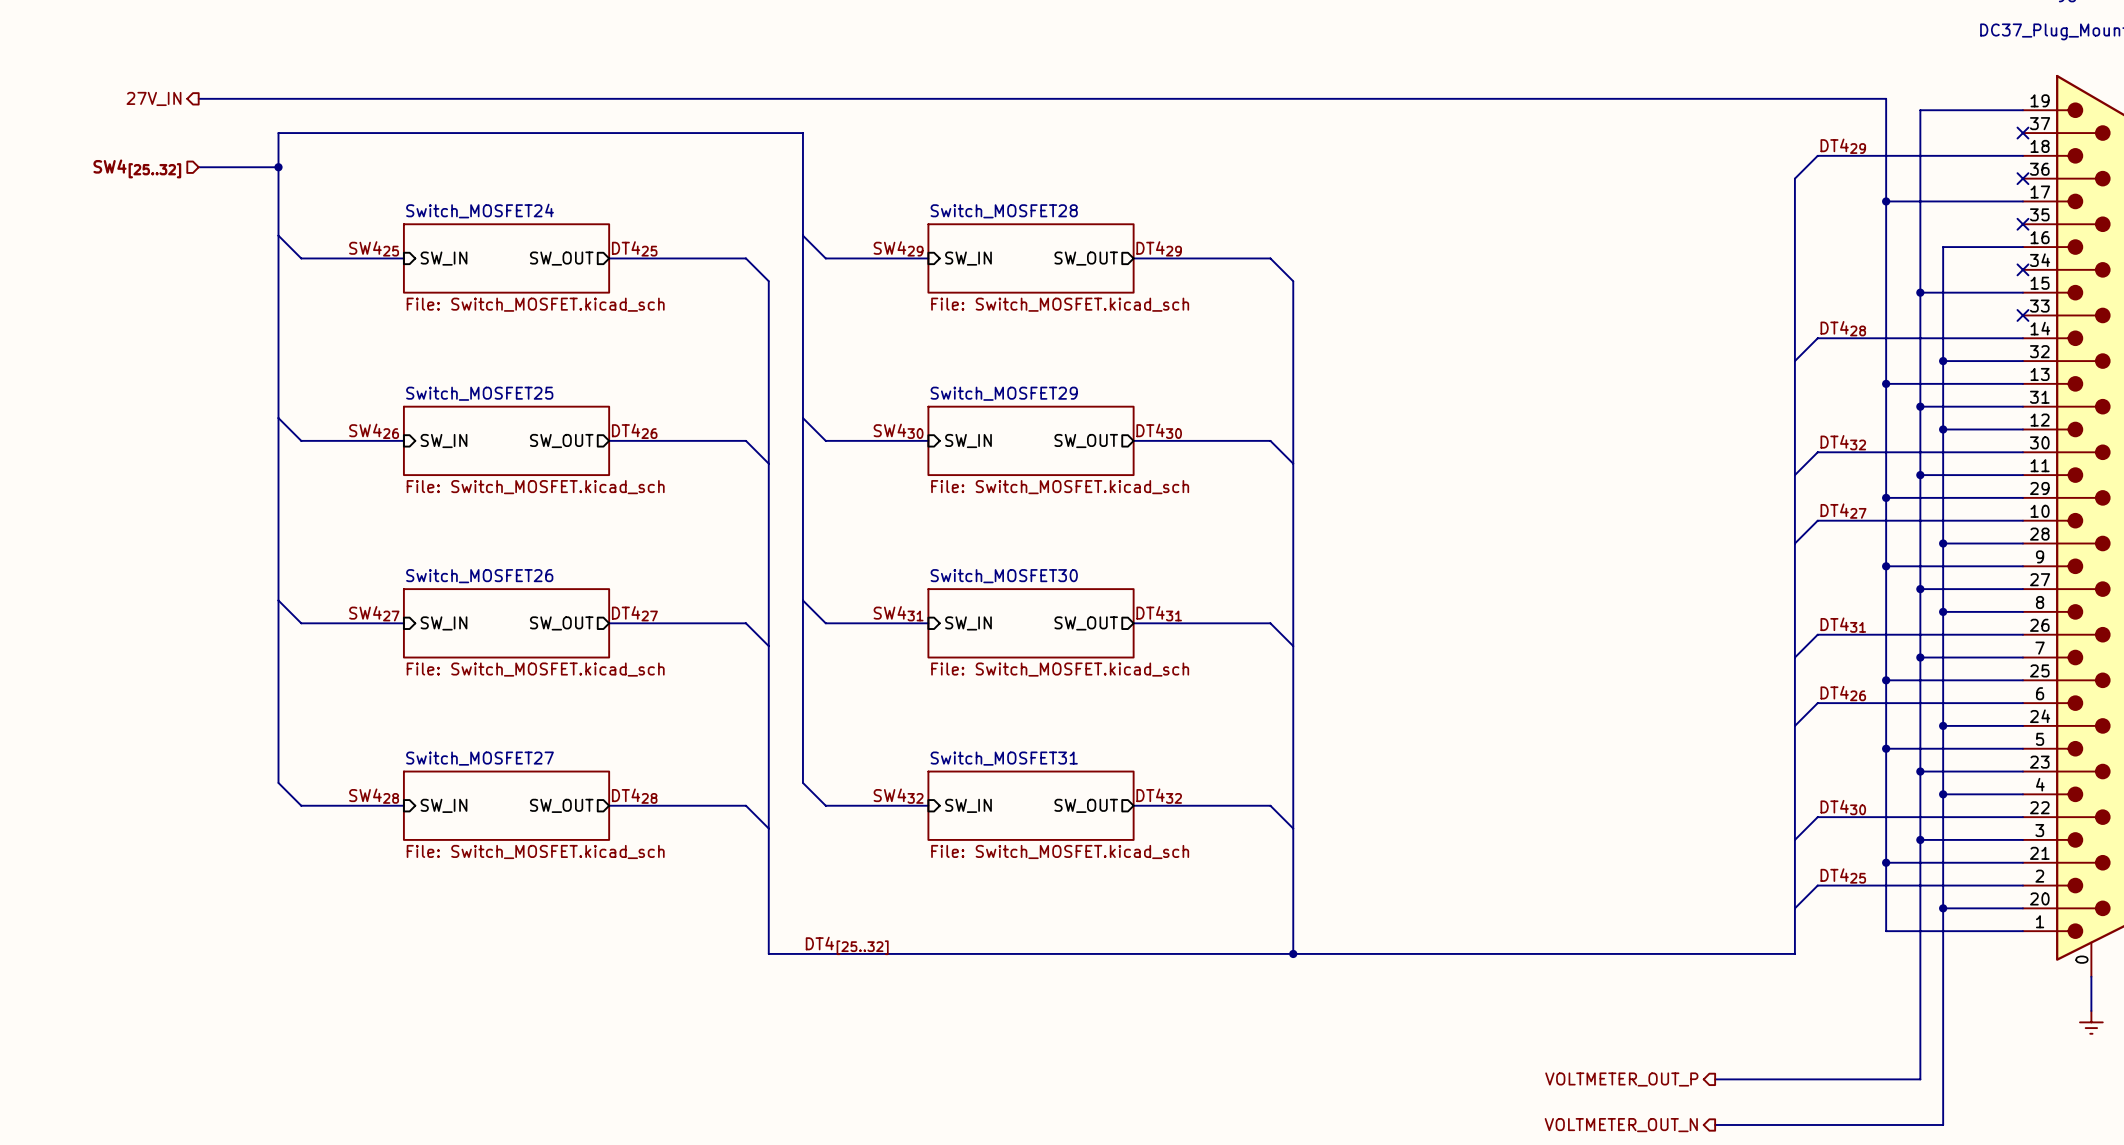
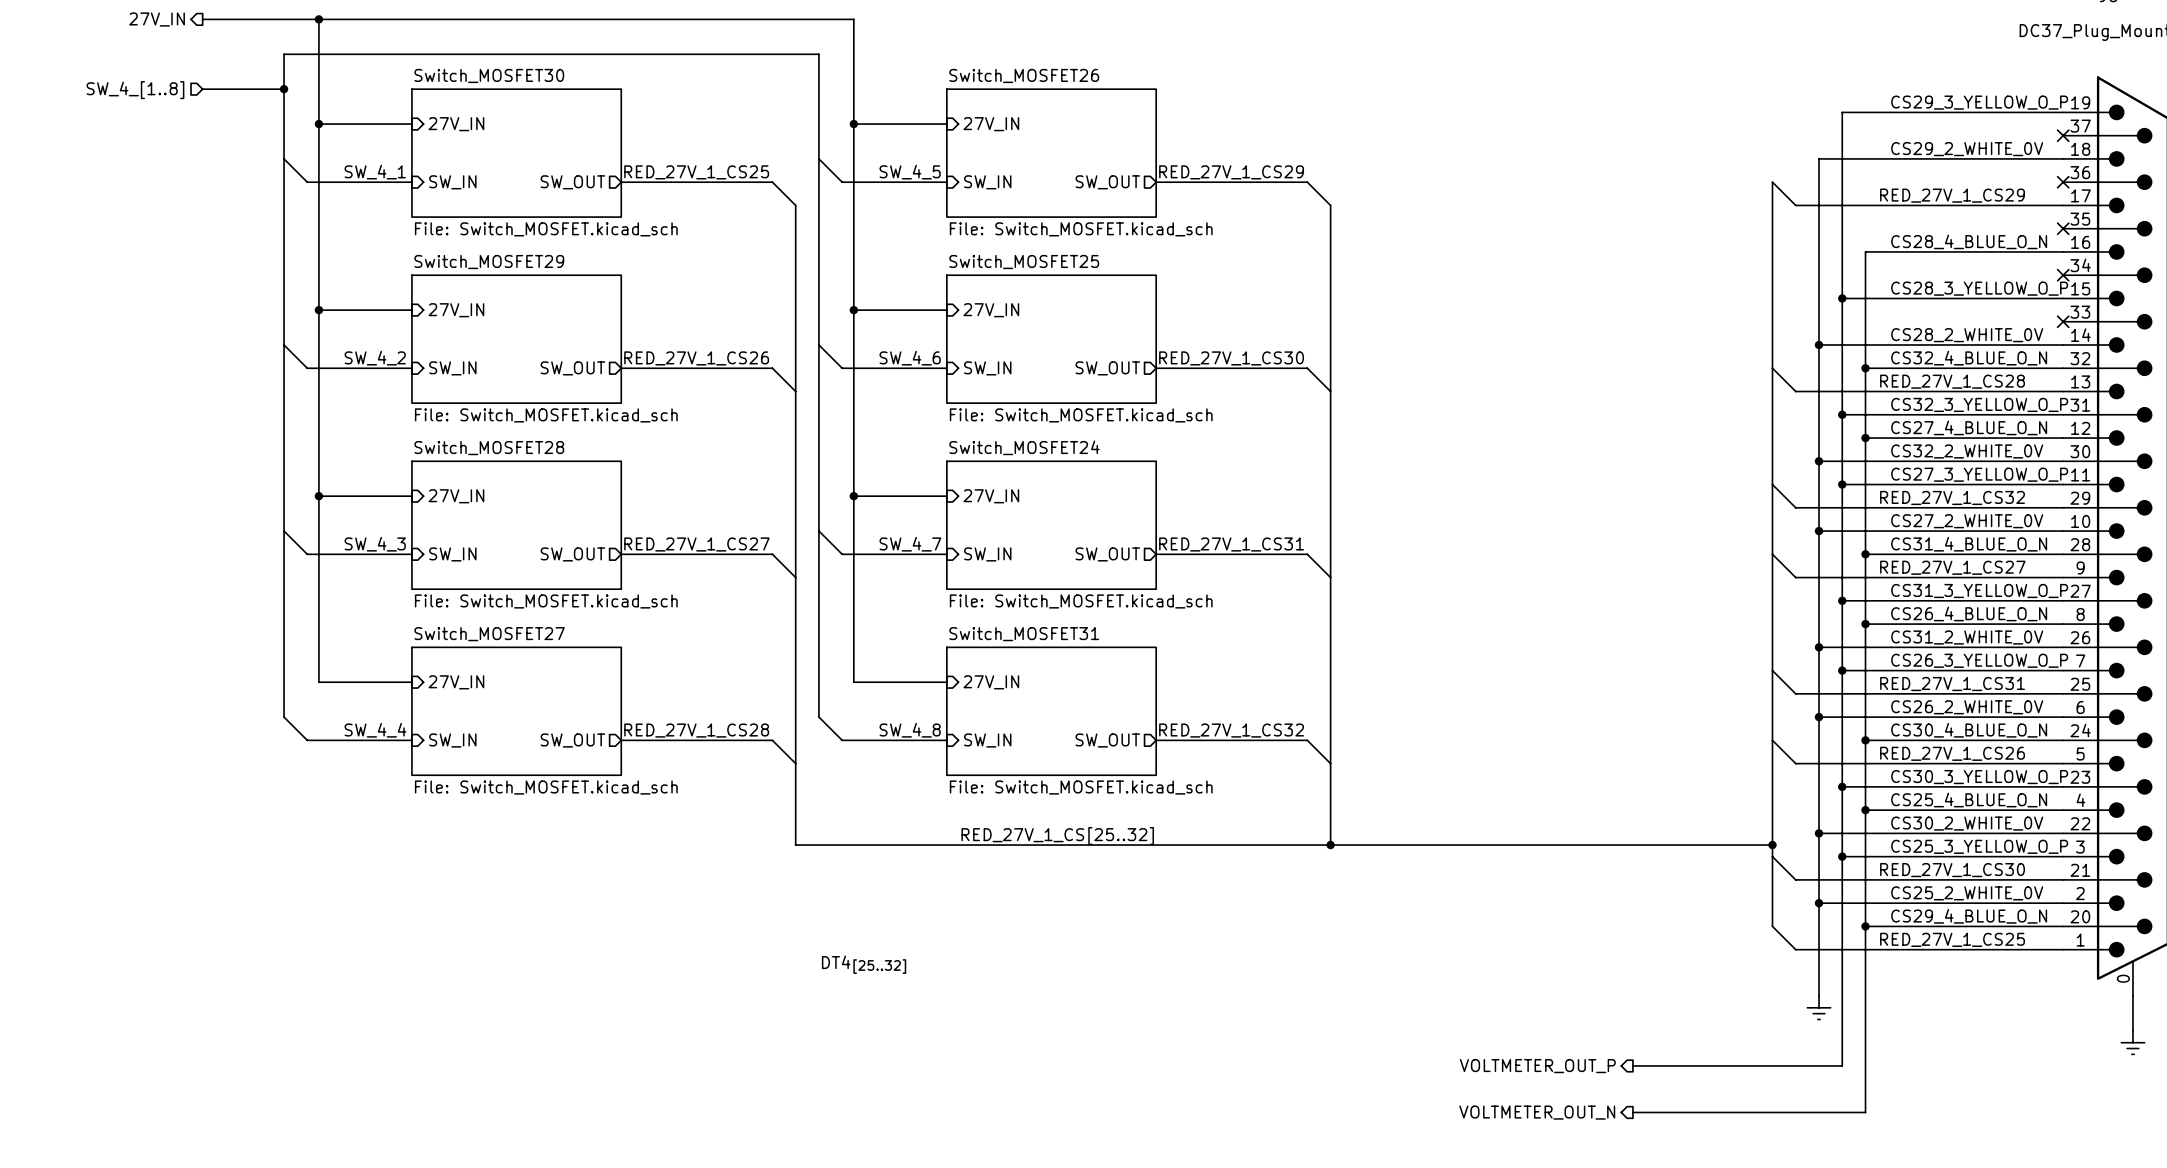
wire: none -> (202, 19) (853, 19) (853, 682) (946, 682)
wire: none -> (318, 19) (318, 682) (411, 682)
junction: none -> (318, 19)
junction: none -> (284, 89)
hierarchical label: none -> SW_4_[1..8] (135, 90)
hierarchical label position: 27V_IN (153, 98) -> 27V_IN (157, 19)
wire: (198, 98) (1886, 98) (1886, 931) -> (1772, 926) (1795, 949) (1923, 949)
label: none -> CS29_3_YELLOW_O_P (1979, 102)
wire: (1920, 110) (1920, 1079) (1715, 1079) -> (1958, 112) (1842, 112) (1842, 1065) (1632, 1065)
wire: none -> (318, 124) (411, 124)
junction: none -> (318, 124)
sheet pin: none -> 27V_IN (456, 124)
wire: none -> (853, 124) (946, 124)
junction: none -> (853, 124)
sheet pin: none -> 27V_IN (991, 124)
bus: (278, 133) (802, 133) -> (284, 135) (284, 54) (818, 54) (818, 135)
label: DT429 (1843, 146) -> none
label: none -> CS29_2_WHITE_0V (1967, 149)
wire: (1817, 155) (1794, 178) -> (1853, 158) (1819, 158) (1819, 996)
bus: (198, 167) (278, 167) -> (202, 89) (284, 89)
junction: (278, 167) -> none
hierarchical label: SW4[25..32] (137, 168) -> none
label: none -> SW_4_1 (375, 172)
label: none -> SW_4_5 (910, 172)
label: none -> RED_27V_1_CS25 (696, 172)
label: none -> RED_27V_1_CS29 (1231, 172)
sheet pin: none -> SW_IN (452, 182)
sheet pin: none -> SW_OUT (572, 182)
wire: none -> (621, 182) (772, 182) (795, 205)
sheet pin: none -> SW_IN (987, 182)
sheet pin: none -> SW_OUT (1107, 182)
wire: none -> (1156, 182) (1307, 182) (1330, 205)
wire: none -> (1772, 182) (1795, 205) (1923, 205)
bus: none -> (1772, 182) (1772, 926)
bus: (1794, 178) (1794, 953) (768, 953) (768, 281) -> none
label: none -> RED_27V_1_CS29 (1952, 195)
bus: none -> (795, 205) (795, 845) (1772, 845)
bus: none -> (1330, 205) (1330, 845)
junction: (1886, 201) -> none
sheet Switch_MOSFET24 name position: Switch_MOSFET24 (480, 211) -> Switch_MOSFET24 (1024, 447)
sheet Switch_MOSFET28 name position: Switch_MOSFET28 (1004, 211) -> Switch_MOSFET28 (489, 448)
sheet Switch_MOSFET24 shape: [403, 223, 610, 294] -> [946, 460, 1157, 590]
sheet Switch_MOSFET28 shape: [927, 223, 1135, 294] -> [411, 460, 622, 590]
wire: (278, 235) (301, 258) (403, 258) -> (284, 158) (307, 182) (411, 182)
wire: (802, 235) (825, 258) (928, 258) -> (818, 158) (842, 182) (946, 182)
label: none -> CS28_4_BLUE_O_N (1969, 241)
wire: (1943, 247) (1943, 1124) (1715, 1124) -> (1981, 251) (1865, 251) (1865, 1112) (1632, 1112)
label: SW425 (374, 248) -> none
label: DT425 (634, 248) -> none
label: SW429 (898, 248) -> none
label: DT429 (1159, 248) -> none
sheet pin: SW_IN (444, 258) -> none
sheet pin: SW_OUT (561, 258) -> none
wire: (609, 258) (745, 258) (768, 281) -> none
sheet pin: SW_IN (968, 258) -> none
sheet pin: SW_OUT (1086, 258) -> none
wire: (1133, 258) (1270, 258) (1293, 281) -> none
bus: (1293, 281) (1293, 953) -> none
label: none -> CS28_3_YELLOW_O_P (1979, 288)
wire: none -> (1842, 298) (1958, 298)
junction: none -> (1842, 298)
junction: (1920, 292) -> none
wire: none -> (318, 310) (411, 310)
junction: none -> (318, 310)
sheet pin: none -> 27V_IN (456, 310)
sheet Switch_MOSFET24 value position: File: Switch_MOSFET.kicad_sch (535, 304) -> File: Switch_MOSFET.kicad_sch (1081, 601)
wire: none -> (853, 310) (946, 310)
junction: none -> (853, 310)
sheet pin: none -> 27V_IN (991, 310)
sheet Switch_MOSFET28 value position: File: Switch_MOSFET.kicad_sch (1060, 304) -> File: Switch_MOSFET.kicad_sch (546, 601)
label: DT428 (1843, 328) -> none
label: none -> CS28_2_WHITE_0V (1967, 335)
junction: none -> (1819, 345)
wire: (1817, 338) (1794, 361) -> (1853, 345) (1819, 345)
label: none -> SW_4_2 (375, 358)
label: none -> RED_27V_1_CS26 (696, 358)
label: none -> SW_4_6 (910, 358)
label: none -> RED_27V_1_CS30 (1231, 358)
label: none -> CS32_4_BLUE_O_N (1969, 358)
sheet pin: none -> SW_IN (452, 368)
sheet pin: none -> SW_OUT (572, 368)
wire: none -> (621, 368) (772, 368) (795, 391)
sheet pin: none -> SW_IN (987, 368)
sheet pin: none -> SW_OUT (1107, 368)
wire: none -> (1156, 368) (1307, 368) (1330, 391)
wire: none -> (1772, 368) (1795, 391) (1923, 391)
wire: none -> (1865, 368) (1981, 368)
junction: none -> (1865, 368)
junction: (1943, 361) -> none
label: none -> RED_27V_1_CS28 (1952, 381)
junction: (1886, 383) -> none
sheet Switch_MOSFET25 name position: Switch_MOSFET25 (479, 393) -> Switch_MOSFET25 (1024, 262)
sheet Switch_MOSFET29 name position: Switch_MOSFET29 (1004, 393) -> Switch_MOSFET29 (489, 262)
label: none -> CS32_3_YELLOW_O_P (1979, 404)
sheet Switch_MOSFET25 shape: [403, 405, 610, 476] -> [946, 274, 1157, 404]
sheet Switch_MOSFET29 shape: [927, 405, 1135, 476] -> [411, 274, 622, 404]
wire: none -> (1842, 414) (1958, 414)
junction: none -> (1842, 414)
junction: (1920, 406) -> none
wire: (278, 418) (301, 440) (403, 440) -> (284, 345) (307, 368) (411, 368)
wire: (802, 418) (825, 440) (928, 440) -> (818, 345) (842, 368) (946, 368)
label: none -> CS27_4_BLUE_O_N (1969, 427)
wire: none -> (1865, 438) (1981, 438)
junction: none -> (1865, 438)
junction: (1943, 429) -> none
label: SW426 (374, 431) -> none
label: DT426 (634, 431) -> none
label: SW430 (898, 431) -> none
label: DT430 (1159, 431) -> none
wire: (609, 440) (745, 440) (768, 463) -> none
wire: (1133, 440) (1270, 440) (1293, 463) -> none
sheet pin: SW_IN (444, 441) -> none
sheet pin: SW_OUT (561, 441) -> none
sheet pin: SW_IN (968, 441) -> none
sheet pin: SW_OUT (1086, 441) -> none
label: DT432 (1843, 442) -> none
label: none -> CS32_2_WHITE_0V (1967, 451)
junction: none -> (1819, 461)
wire: (1817, 452) (1794, 475) -> (1853, 461) (1819, 461)
label: none -> CS27_3_YELLOW_O_P (1979, 474)
wire: none -> (1772, 484) (1795, 507) (1923, 507)
wire: none -> (1842, 484) (1958, 484)
junction: none -> (1842, 484)
junction: (1920, 475) -> none
wire: none -> (318, 496) (411, 496)
junction: none -> (318, 496)
sheet pin: none -> 27V_IN (456, 496)
wire: none -> (853, 496) (946, 496)
junction: none -> (853, 496)
sheet pin: none -> 27V_IN (991, 496)
sheet Switch_MOSFET25 value position: File: Switch_MOSFET.kicad_sch (535, 487) -> File: Switch_MOSFET.kicad_sch (1081, 415)
sheet Switch_MOSFET29 value position: File: Switch_MOSFET.kicad_sch (1060, 487) -> File: Switch_MOSFET.kicad_sch (546, 415)
label: none -> RED_27V_1_CS32 (1952, 497)
junction: (1886, 497) -> none
label: DT427 (1843, 511) -> none
label: none -> CS27_2_WHITE_0V (1967, 521)
junction: none -> (1819, 531)
wire: (1817, 520) (1794, 543) -> (1853, 531) (1819, 531)
label: none -> SW_4_3 (375, 544)
label: none -> RED_27V_1_CS27 (696, 544)
label: none -> SW_4_7 (910, 544)
label: none -> RED_27V_1_CS31 (1231, 544)
label: none -> CS31_4_BLUE_O_N (1969, 544)
sheet pin: none -> SW_IN (452, 554)
sheet pin: none -> SW_OUT (572, 554)
wire: none -> (621, 554) (772, 554) (795, 577)
sheet pin: none -> SW_IN (987, 554)
sheet pin: none -> SW_OUT (1107, 554)
wire: none -> (1156, 554) (1307, 554) (1330, 577)
wire: none -> (1772, 554) (1795, 577) (1923, 577)
wire: none -> (1865, 554) (1981, 554)
junction: none -> (1865, 554)
junction: (1943, 543) -> none
label: none -> RED_27V_1_CS27 (1952, 567)
junction: (1886, 566) -> none
sheet Switch_MOSFET26 name position: Switch_MOSFET26 (479, 576) -> Switch_MOSFET26 (1024, 75)
sheet Switch_MOSFET30 name position: Switch_MOSFET30 (1004, 576) -> Switch_MOSFET30 (489, 75)
label: none -> CS31_3_YELLOW_O_P (1979, 591)
sheet Switch_MOSFET26 shape: [403, 588, 610, 659] -> [946, 88, 1157, 218]
sheet Switch_MOSFET30 shape: [927, 588, 1135, 659] -> [411, 88, 622, 218]
wire: none -> (1842, 600) (1958, 600)
junction: none -> (1842, 600)
junction: (1920, 589) -> none
wire: (278, 600) (301, 623) (403, 623) -> (284, 531) (307, 554) (411, 554)
wire: (802, 600) (825, 623) (928, 623) -> (818, 531) (842, 554) (946, 554)
label: none -> CS26_4_BLUE_O_N (1969, 613)
wire: none -> (1865, 624) (1981, 624)
junction: none -> (1865, 624)
junction: (1943, 611) -> none
label: SW427 (374, 613) -> none
label: DT427 (634, 613) -> none
label: SW431 (898, 613) -> none
label: DT431 (1159, 613) -> none
sheet pin: SW_IN (444, 623) -> none
sheet pin: SW_OUT (561, 623) -> none
wire: (609, 623) (745, 623) (768, 646) -> none
sheet pin: SW_IN (968, 623) -> none
sheet pin: SW_OUT (1086, 623) -> none
wire: (1133, 623) (1270, 623) (1293, 646) -> none
label: DT431 (1843, 625) -> none
label: none -> CS31_2_WHITE_0V (1967, 637)
junction: none -> (1819, 647)
wire: (1817, 634) (1794, 657) -> (1853, 647) (1819, 647)
label: none -> CS26_3_YELLOW_O_P (1979, 660)
wire: none -> (1772, 670) (1795, 693) (1923, 693)
wire: none -> (1842, 670) (1958, 670)
junction: none -> (1842, 670)
junction: (1920, 657) -> none
sheet pin: none -> 27V_IN (456, 682)
sheet Switch_MOSFET26 value position: File: Switch_MOSFET.kicad_sch (535, 669) -> File: Switch_MOSFET.kicad_sch (1081, 229)
sheet pin: none -> 27V_IN (991, 682)
sheet Switch_MOSFET30 value position: File: Switch_MOSFET.kicad_sch (1060, 669) -> File: Switch_MOSFET.kicad_sch (546, 229)
label: none -> RED_27V_1_CS31 (1952, 684)
junction: (1886, 680) -> none
label: DT426 (1843, 693) -> none
label: none -> CS26_2_WHITE_0V (1967, 707)
bus: (278, 703) (278, 782) -> none
bus: (802, 703) (802, 782) -> none
junction: none -> (1819, 717)
wire: (1817, 703) (1794, 725) -> (1853, 717) (1819, 717)
label: none -> SW_4_4 (375, 730)
label: none -> RED_27V_1_CS28 (696, 730)
label: none -> SW_4_8 (910, 730)
label: none -> RED_27V_1_CS32 (1231, 730)
label: none -> CS30_4_BLUE_O_N (1969, 730)
wire: none -> (621, 740) (772, 740) (795, 763)
wire: none -> (1156, 740) (1307, 740) (1330, 763)
wire: none -> (1772, 740) (1795, 763) (1923, 763)
wire: none -> (1865, 740) (1981, 740)
junction: none -> (1865, 740)
junction: (1943, 725) -> none
sheet pin: none -> SW_IN (452, 740)
sheet pin: none -> SW_OUT (572, 740)
sheet pin: none -> SW_IN (987, 740)
sheet pin: none -> SW_OUT (1107, 740)
label: none -> RED_27V_1_CS26 (1952, 753)
junction: (1886, 748) -> none
sheet Switch_MOSFET27 name position: Switch_MOSFET27 (480, 758) -> Switch_MOSFET27 (489, 634)
sheet Switch_MOSFET31 name position: Switch_MOSFET31 (1004, 758) -> Switch_MOSFET31 (1024, 634)
label: none -> CS30_3_YELLOW_O_P (1979, 777)
sheet Switch_MOSFET27 shape: [403, 770, 610, 841] -> [411, 646, 622, 776]
sheet Switch_MOSFET31 shape: [927, 770, 1135, 841] -> [946, 646, 1157, 776]
wire: none -> (1842, 786) (1958, 786)
junction: none -> (1842, 786)
junction: (1920, 771) -> none
wire: (278, 782) (301, 805) (403, 805) -> (284, 717) (307, 740) (411, 740)
wire: (802, 782) (825, 805) (928, 805) -> (818, 717) (842, 740) (946, 740)
label: none -> CS25_4_BLUE_O_N (1969, 800)
wire: none -> (1865, 810) (1981, 810)
junction: none -> (1865, 810)
junction: (1943, 794) -> none
label: SW428 (374, 796) -> none
label: DT428 (634, 796) -> none
label: SW432 (898, 796) -> none
label: DT432 (1159, 796) -> none
sheet pin: SW_IN (444, 805) -> none
sheet pin: SW_OUT (561, 805) -> none
wire: (609, 805) (745, 805) (768, 828) -> none
sheet pin: SW_IN (968, 805) -> none
sheet pin: SW_OUT (1086, 805) -> none
wire: (1133, 805) (1270, 805) (1293, 828) -> none
label: DT430 (1843, 807) -> none
label: none -> CS30_2_WHITE_0V (1967, 823)
junction: none -> (1819, 833)
wire: (1817, 817) (1794, 839) -> (1853, 833) (1819, 833)
label: none -> RED_27V_1_CS[25..32] (1057, 836)
junction: none -> (1330, 845)
junction: none -> (1772, 845)
label: none -> CS25_3_YELLOW_O_P (1979, 846)
wire: none -> (1772, 856) (1795, 879) (1923, 879)
wire: none -> (1842, 856) (1958, 856)
junction: none -> (1842, 856)
junction: (1920, 839) -> none
sheet Switch_MOSFET27 value position: File: Switch_MOSFET.kicad_sch (535, 851) -> File: Switch_MOSFET.kicad_sch (546, 787)
sheet Switch_MOSFET31 value position: File: Switch_MOSFET.kicad_sch (1060, 851) -> File: Switch_MOSFET.kicad_sch (1081, 787)
label: none -> RED_27V_1_CS30 (1952, 870)
junction: (1886, 862) -> none
label: DT425 (1843, 875) -> none
label: none -> CS25_2_WHITE_0V (1967, 893)
junction: none -> (1819, 903)
wire: (1817, 885) (1794, 908) -> (1853, 903) (1819, 903)
label: none -> CS29_4_BLUE_O_N (1969, 916)
wire: none -> (1865, 926) (1981, 926)
junction: none -> (1865, 926)
junction: (1943, 908) -> none
label: none -> RED_27V_1_CS25 (1952, 939)
junction: (1293, 953) -> none
power symbol: none -> (1819, 1007)
hierarchical label position: VOLTMETER_OUT_P (1621, 1079) -> VOLTMETER_OUT_P (1537, 1066)
hierarchical label position: VOLTMETER_OUT_N (1621, 1125) -> VOLTMETER_OUT_N (1537, 1112)

